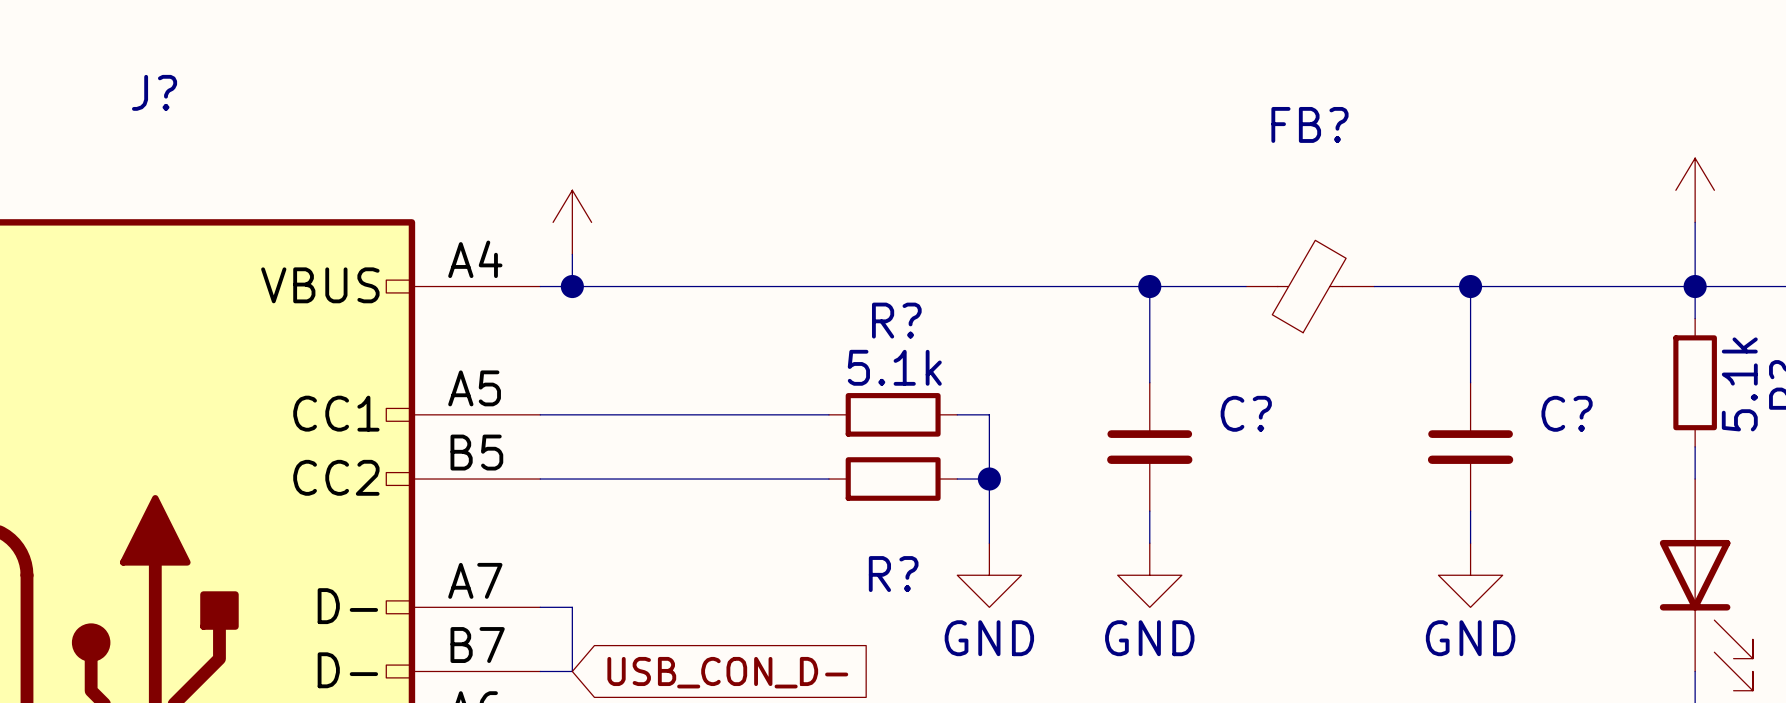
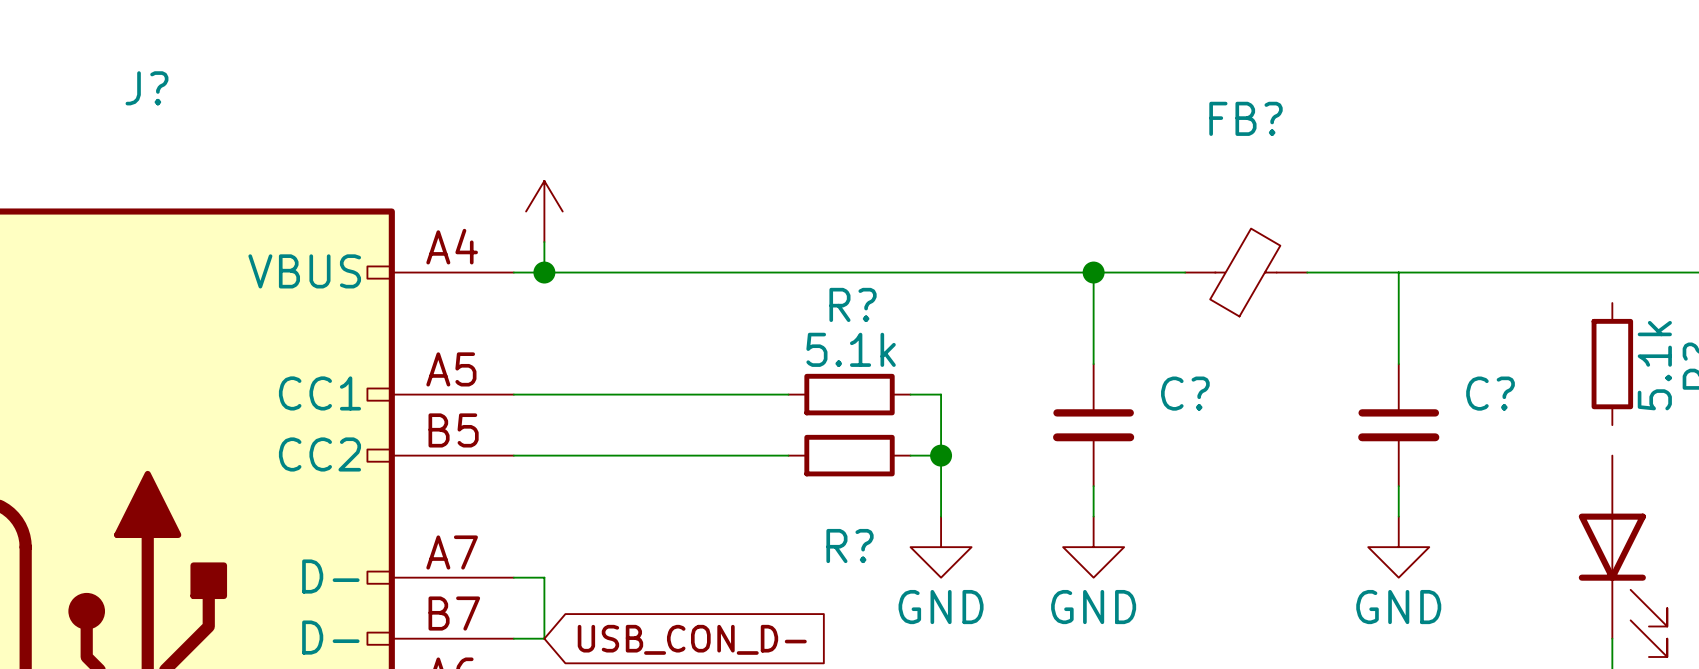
power symbol: (1695, 190) -> none
wire: (1695, 222) (1695, 318) -> none
junction: (1470, 286) -> none
junction: (1695, 286) -> none
wire: (1695, 446) (1695, 479) -> none

